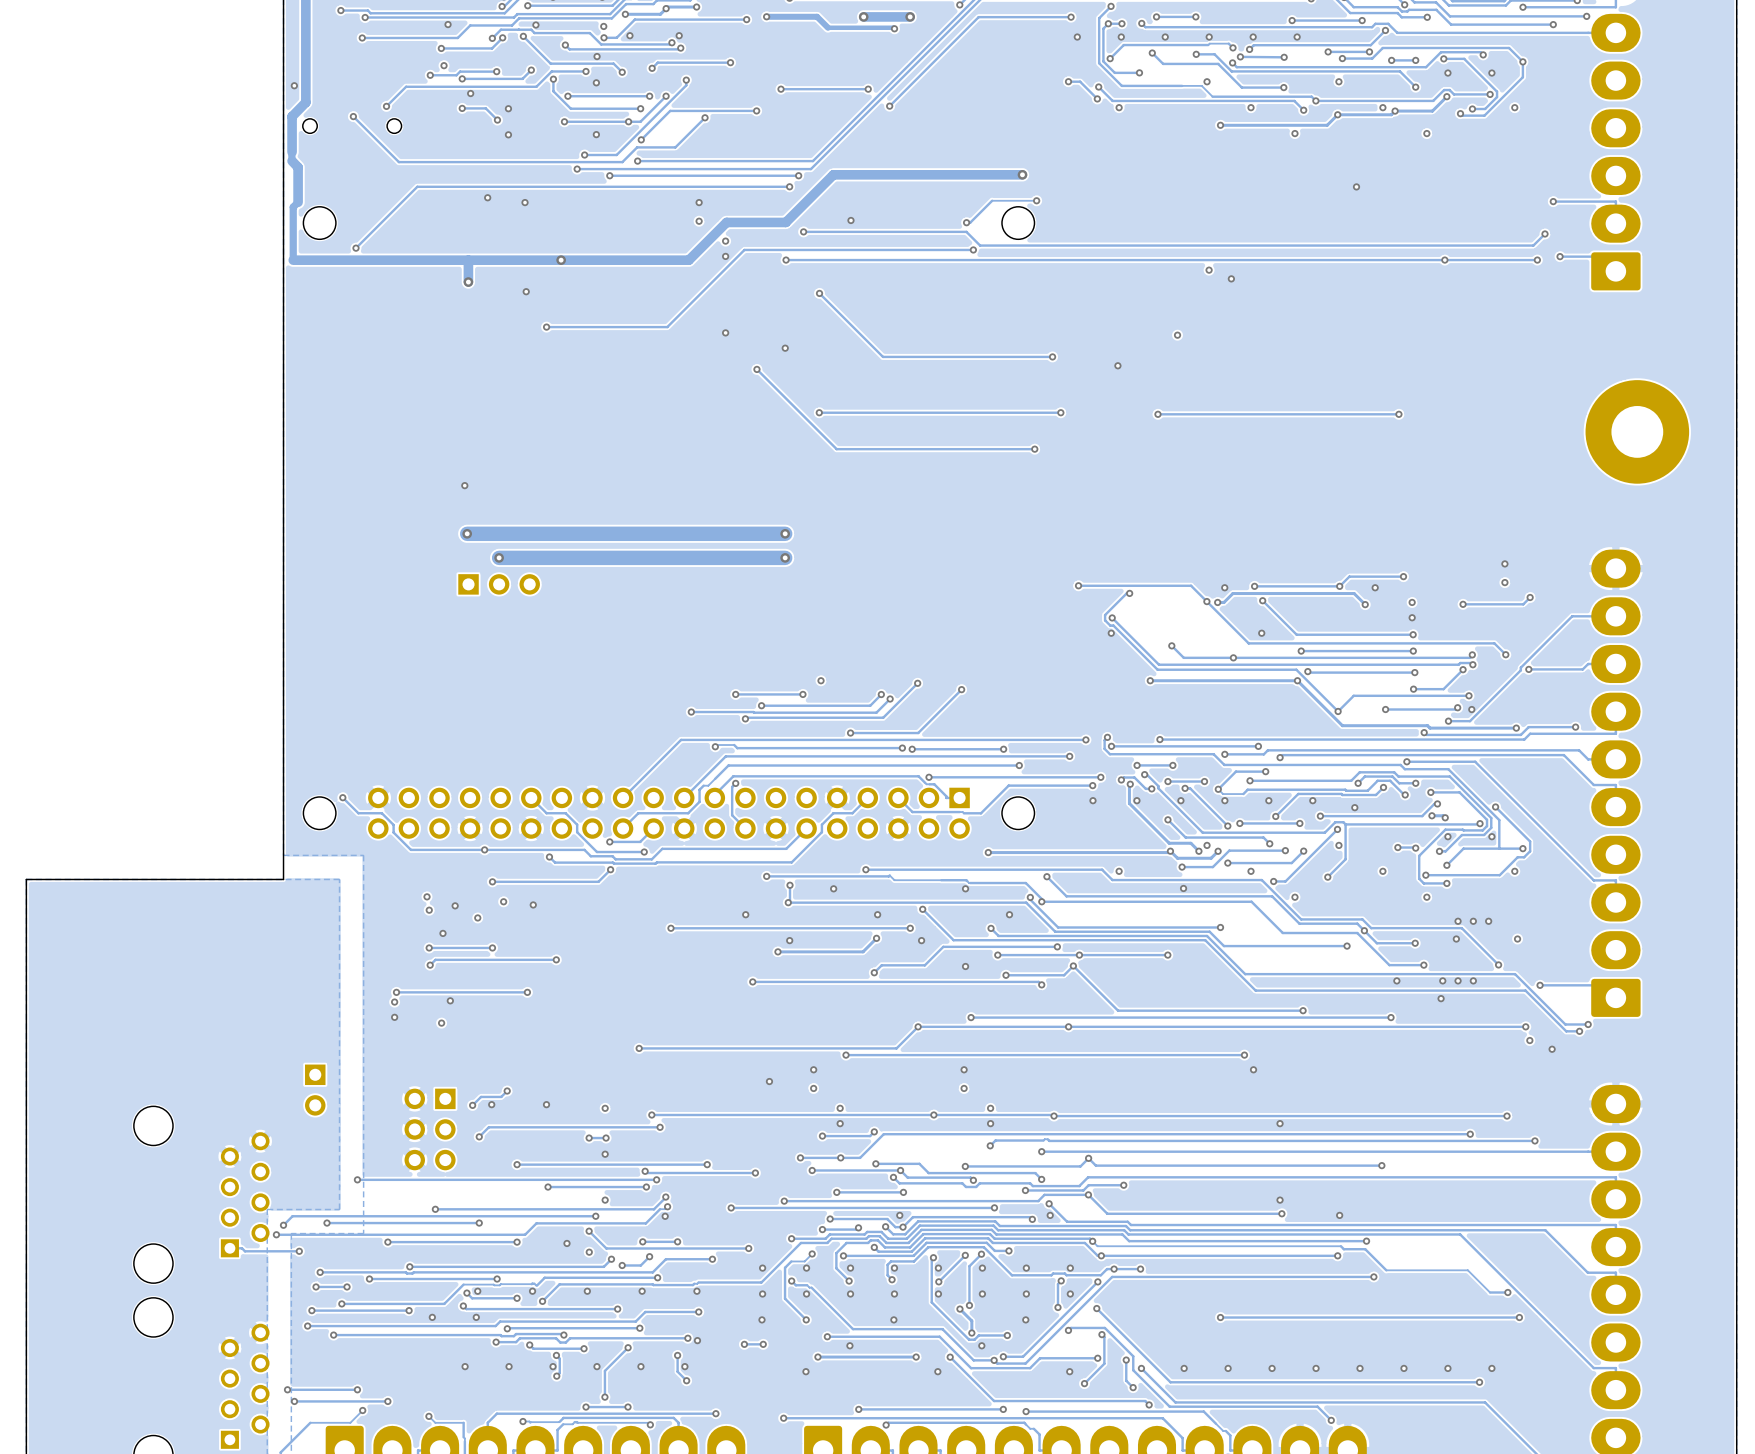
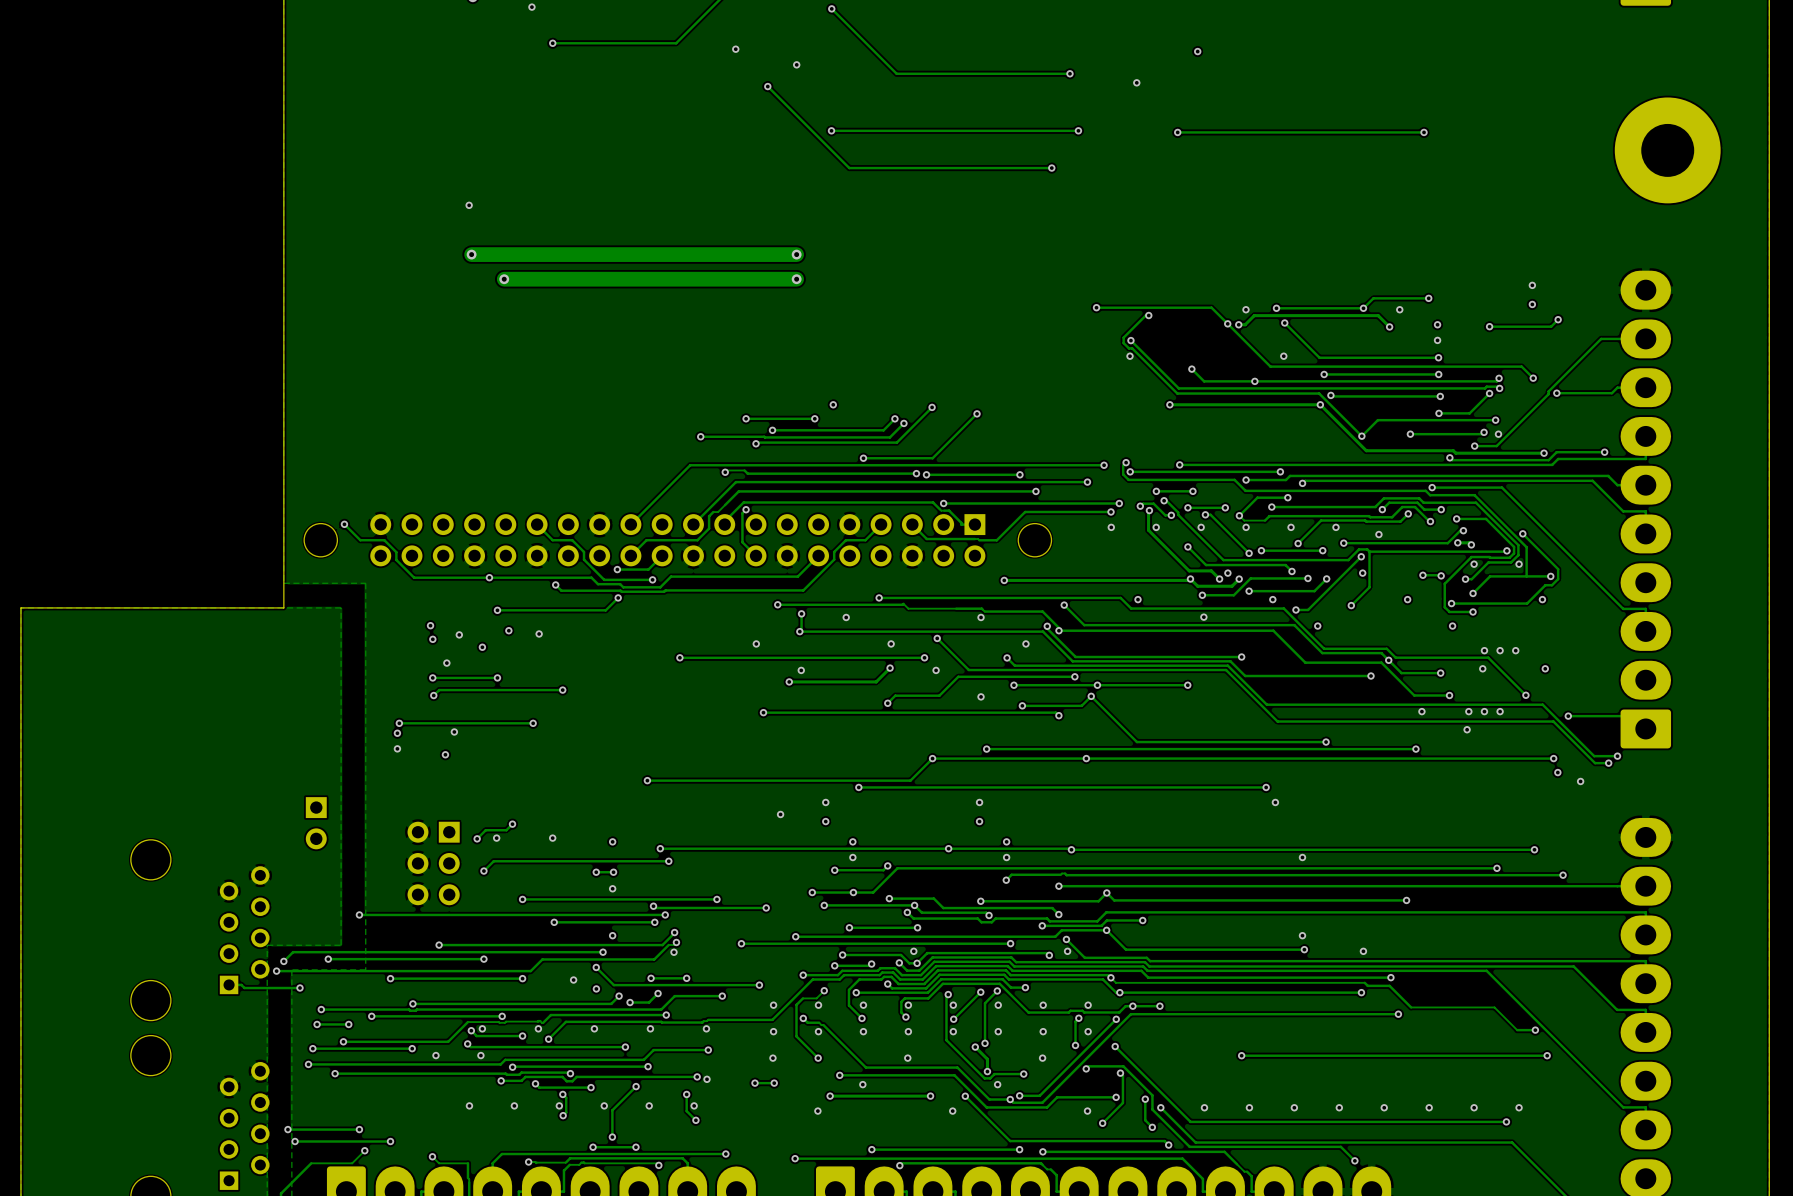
part: (499, 584) -> none

